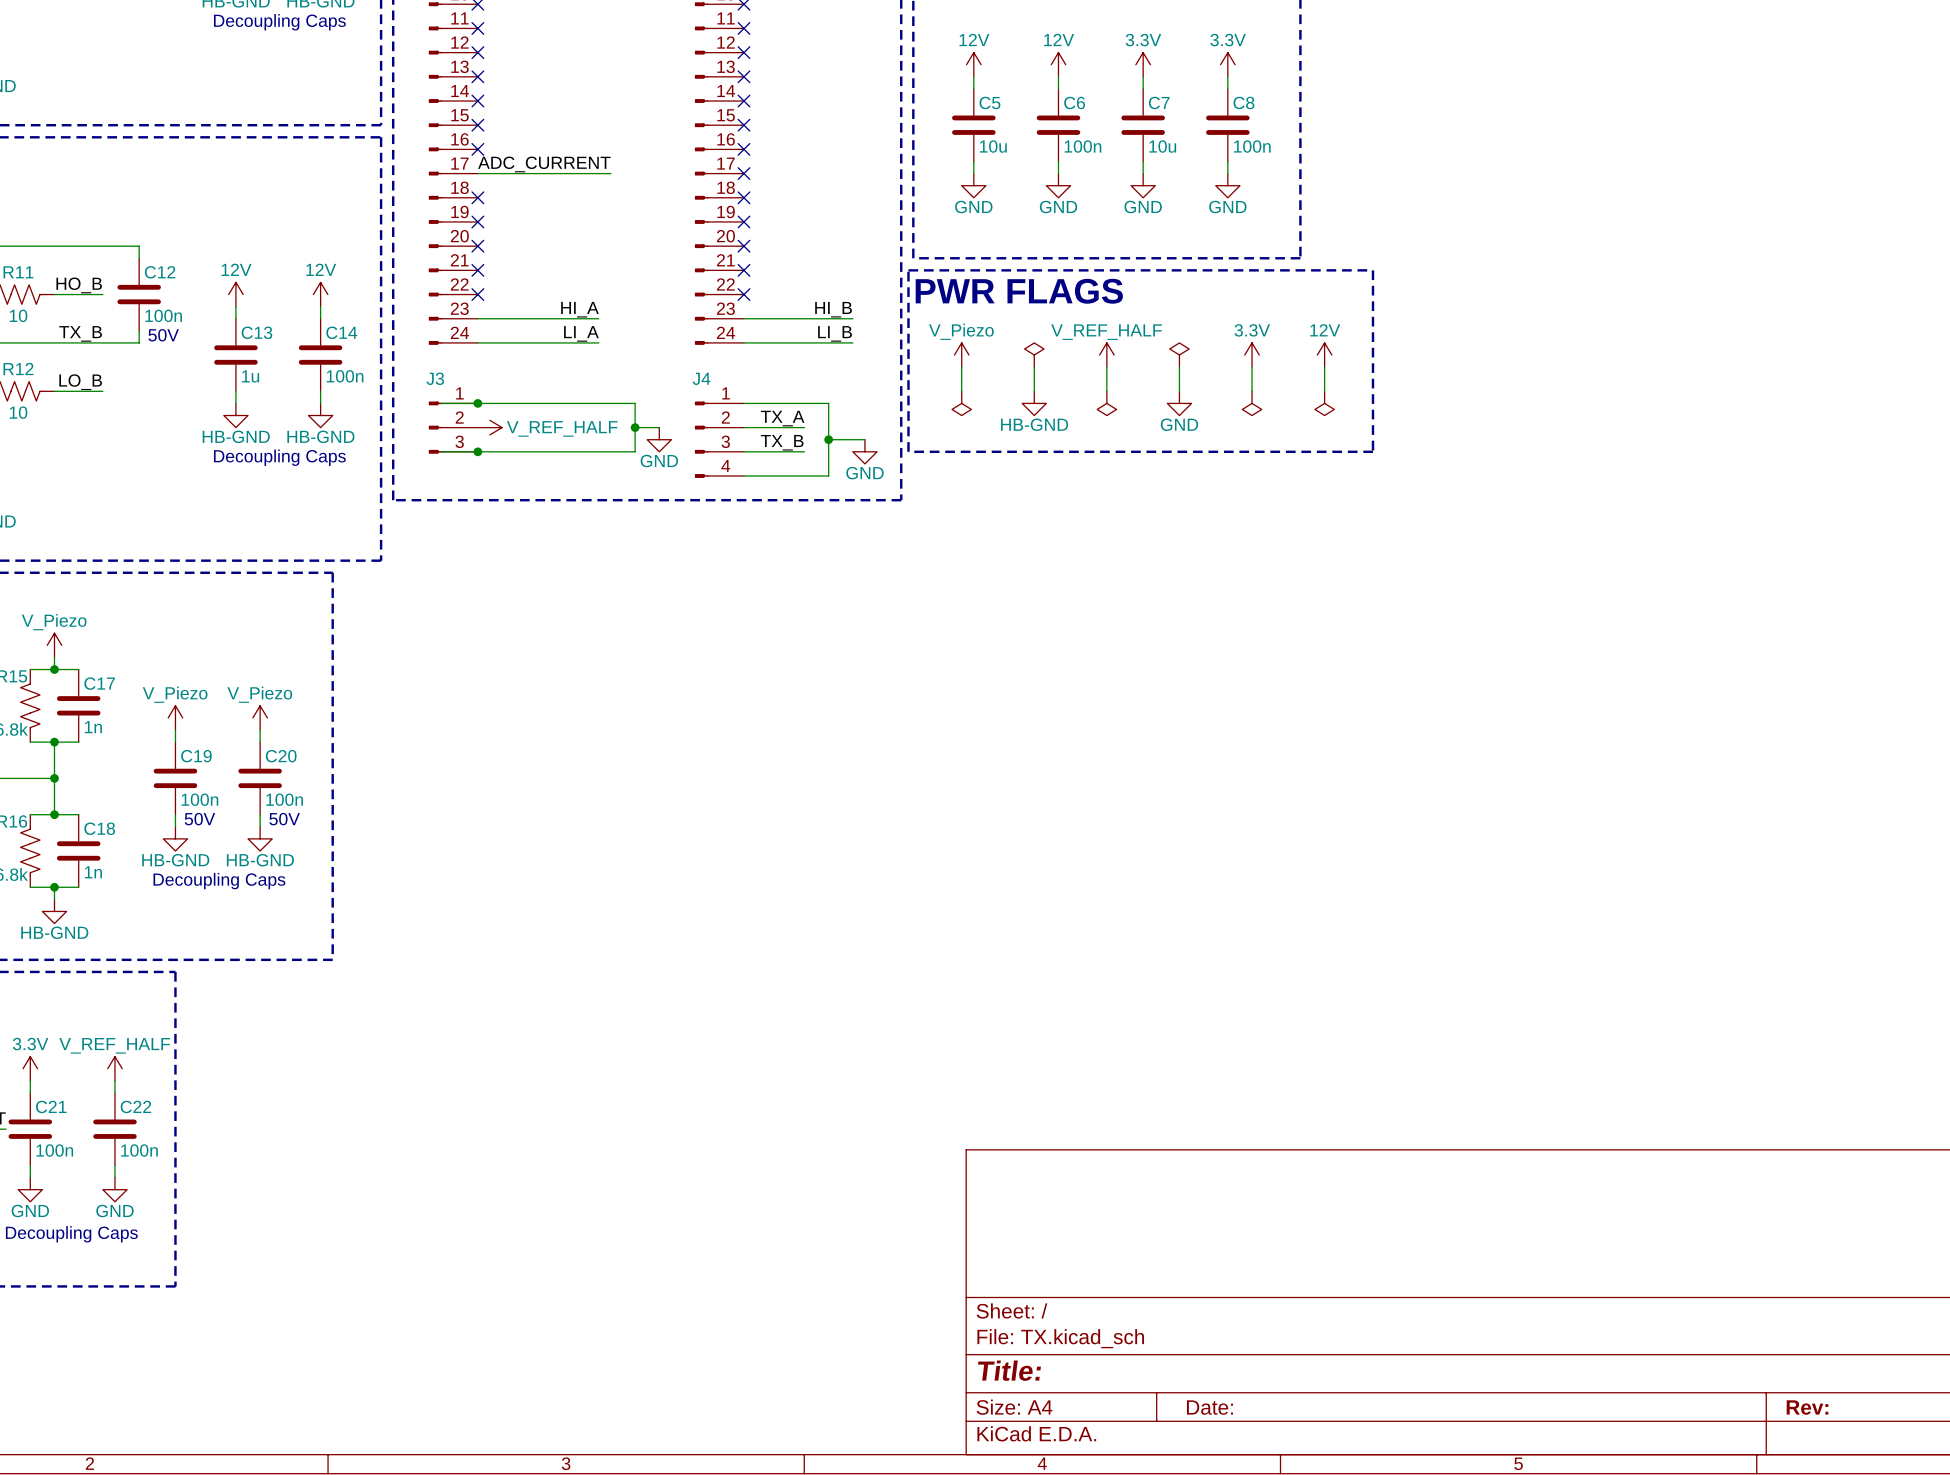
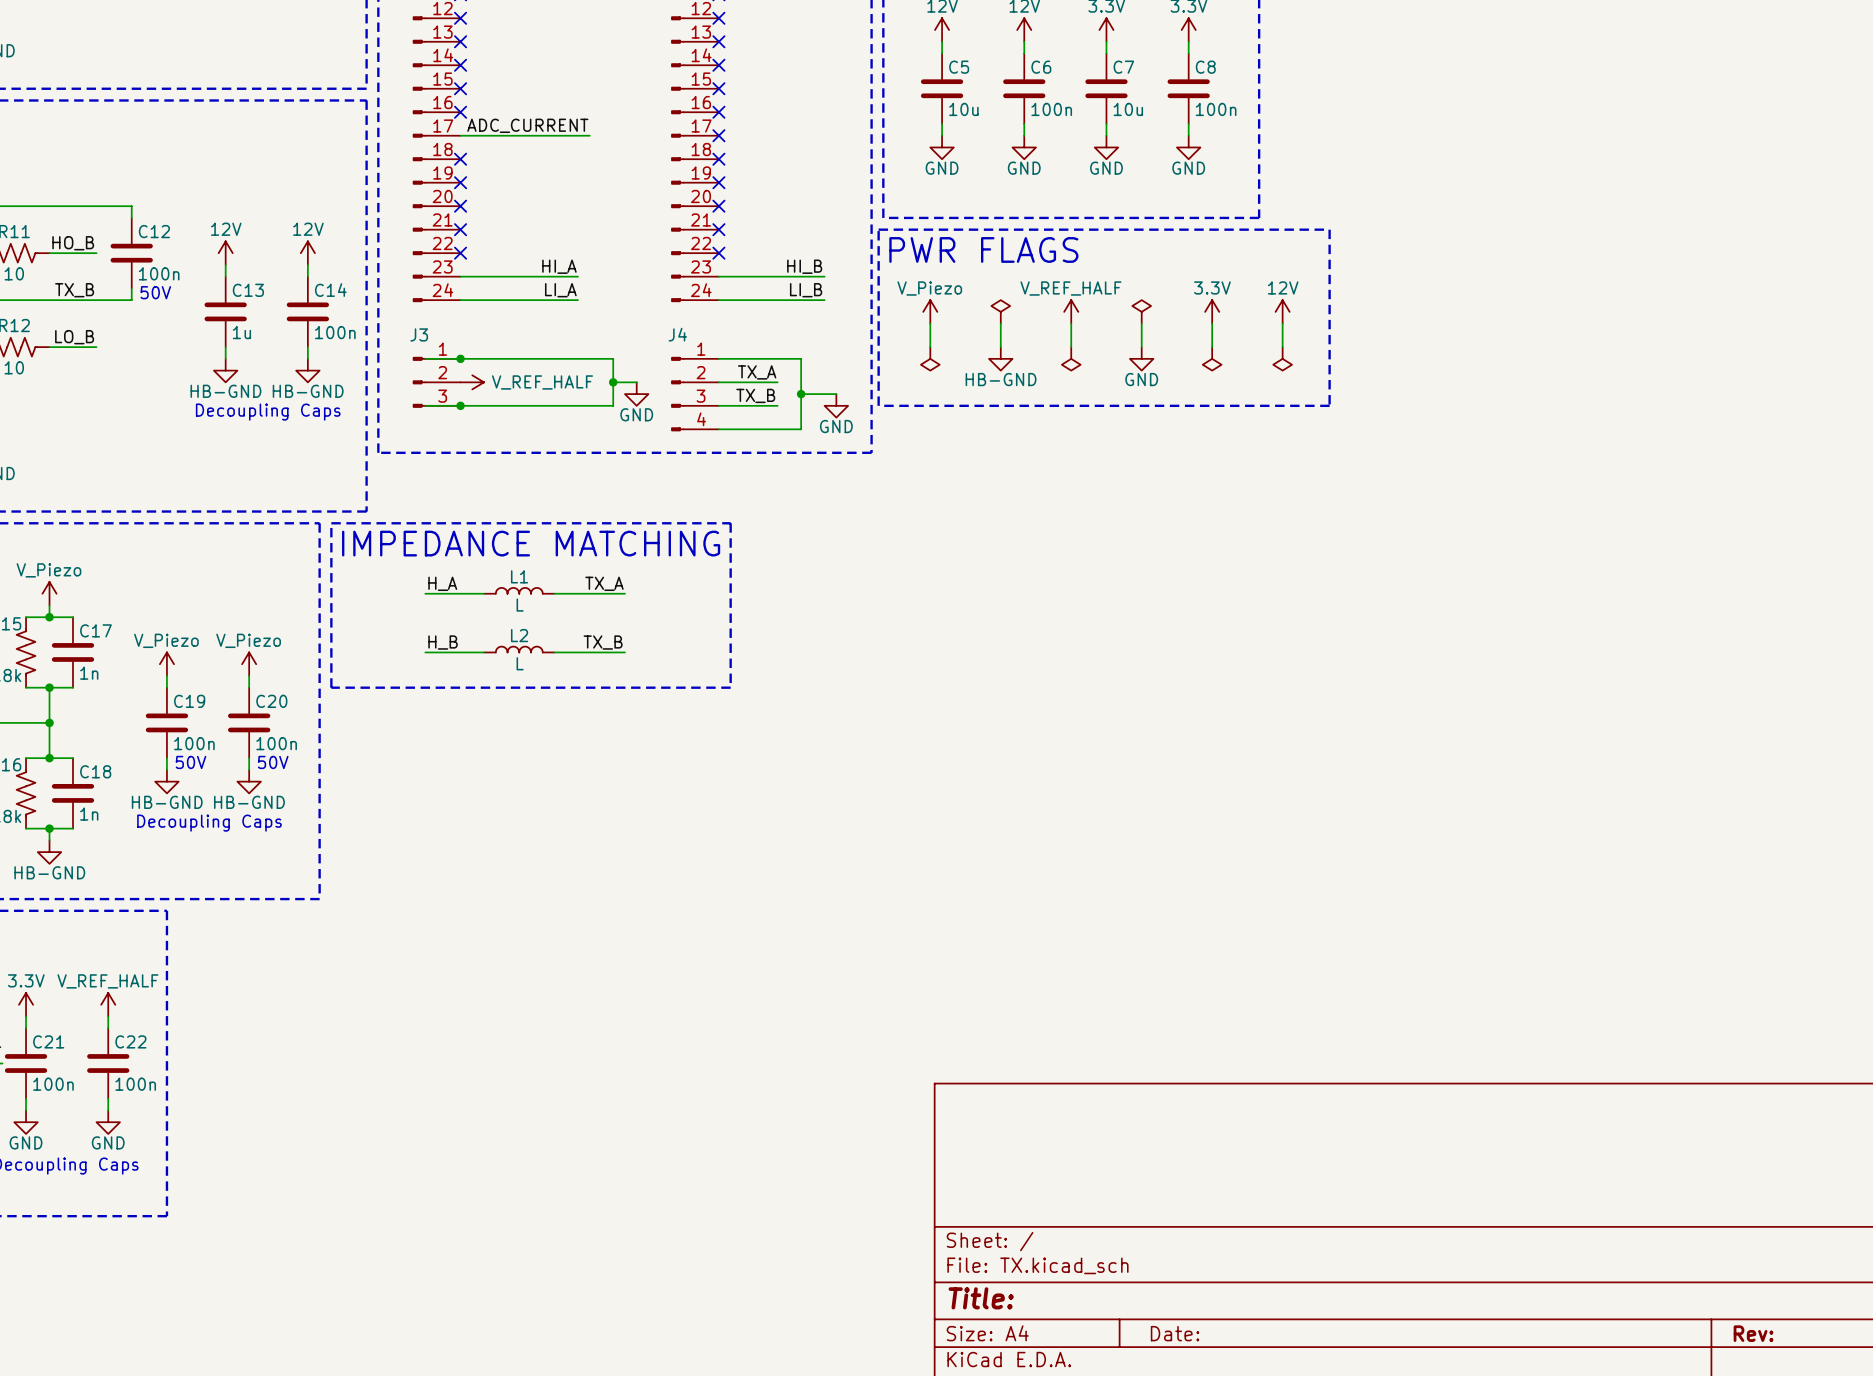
line: none -> (331, 523) (730, 523) (730, 687) (331, 687) (331, 523)
text: none -> IMPEDANCE MATCHING (531, 543)
label: none -> H_A (442, 583)
label: none -> TX_A (604, 583)
L1: none -> L (519, 590)
wire: none -> (425, 593) (484, 593)
wire: none -> (554, 593) (624, 593)
label: none -> H_B (443, 642)
label: none -> TX_B (603, 642)
L2: none -> L (519, 649)
wire: none -> (425, 652) (484, 652)
wire: none -> (554, 652) (624, 652)

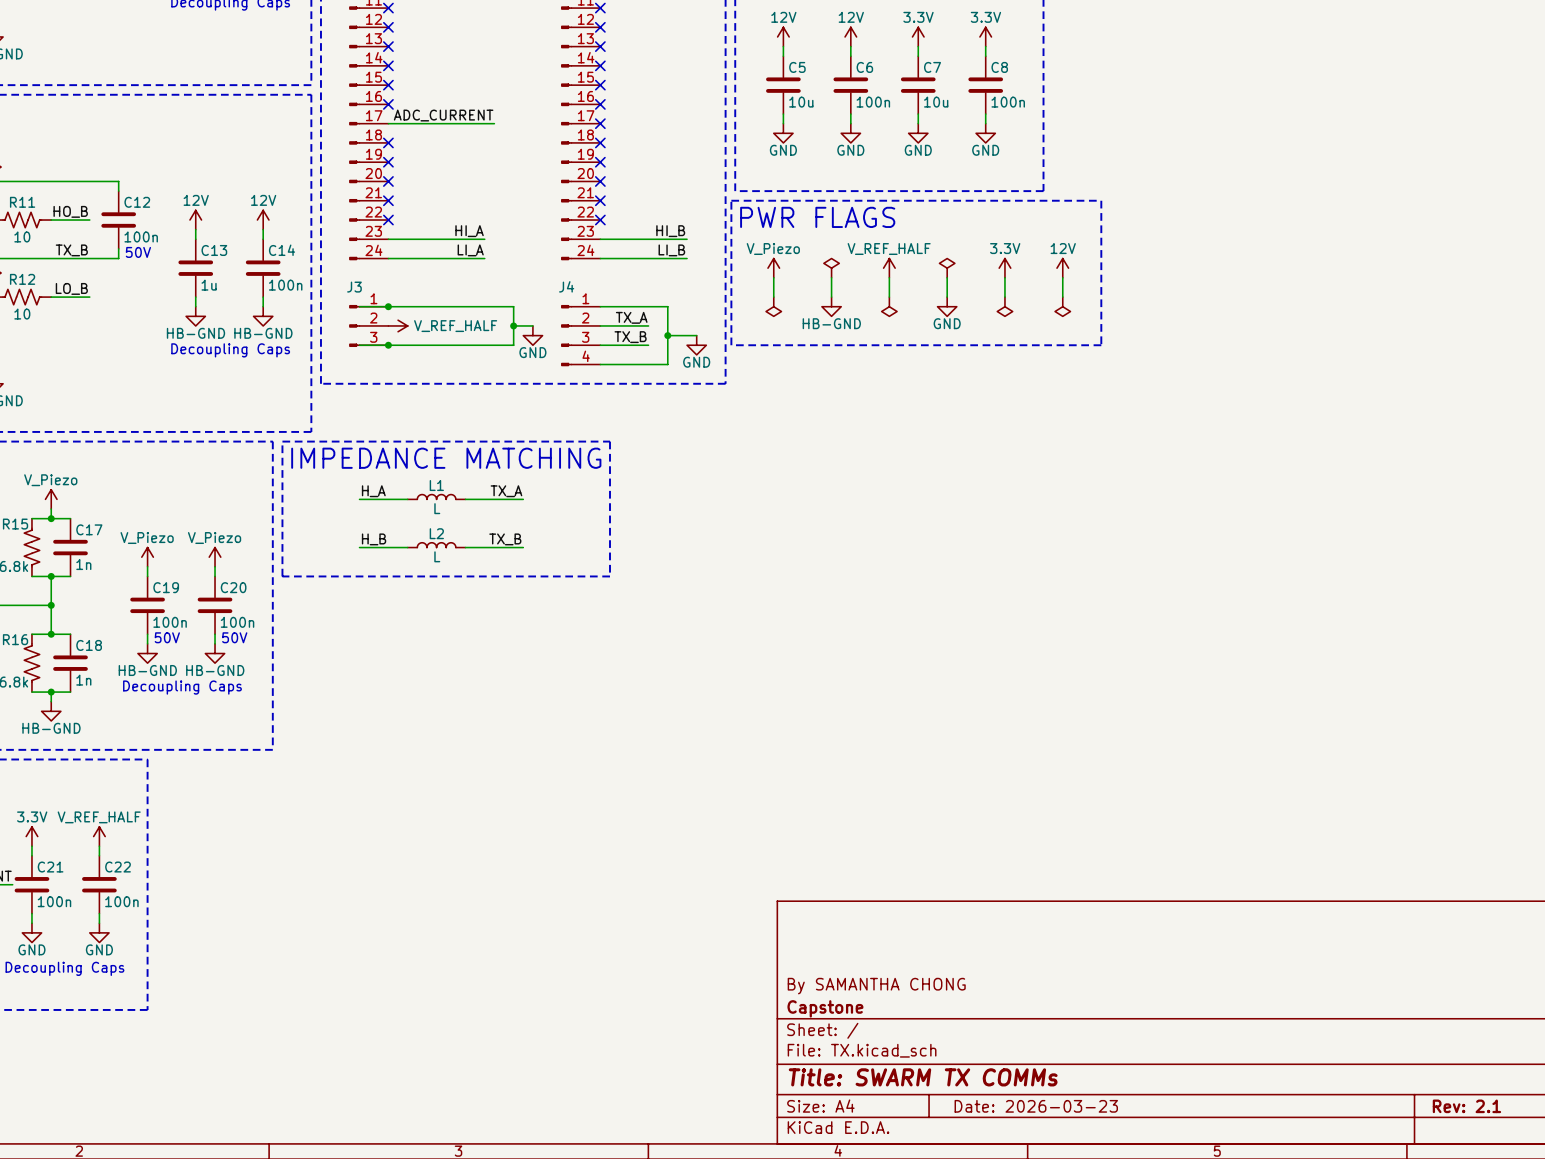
title block: none -> By SAMANTHA CHONG (876, 986)
title block: none -> Capstone (825, 1008)
title block: Title: (981, 1298) -> Title: SWARM TX COMMs (923, 1077)
title block: Date: (1175, 1333) -> Date: 2026-03-23 (1036, 1106)
title block: Rev: (1753, 1333) -> Rev: 2.1 (1466, 1106)

